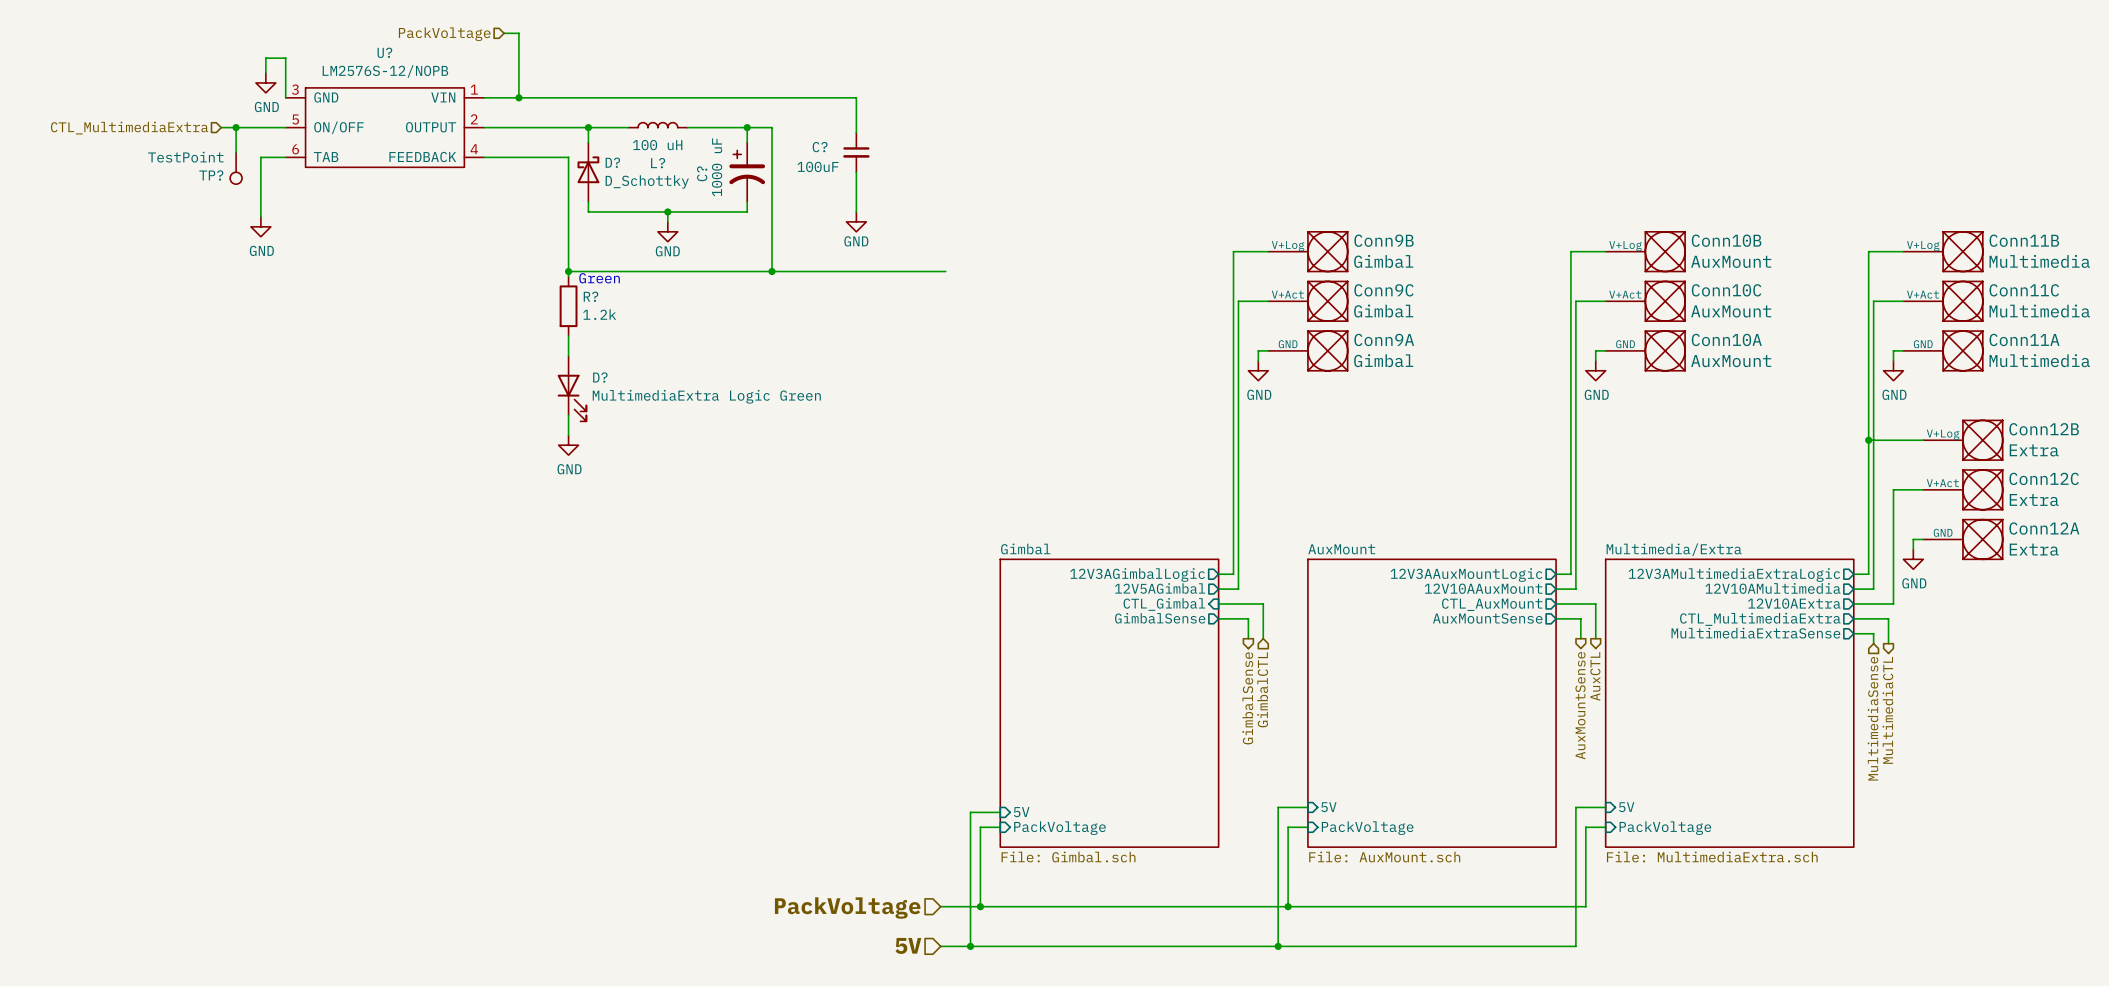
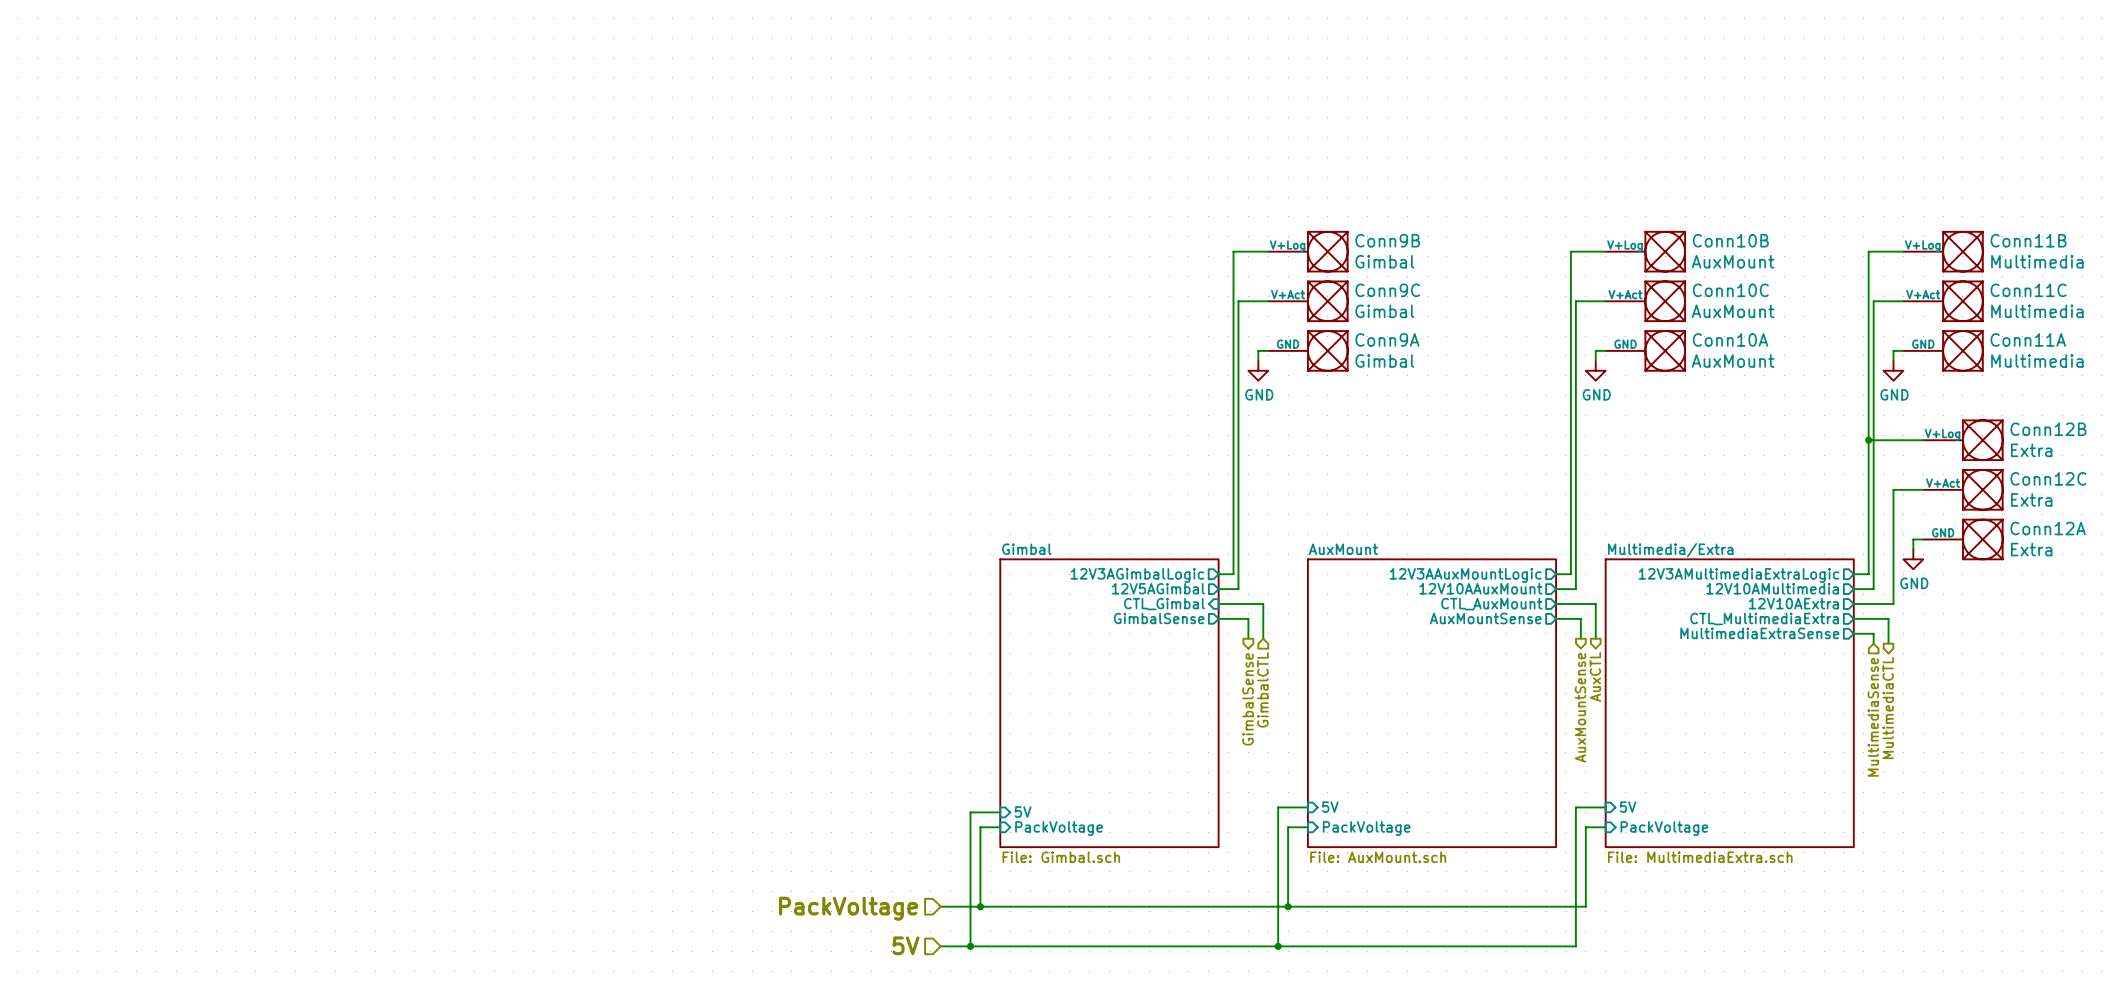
wire: (504, 33) (518, 33) (518, 97) -> none
hierarchical label: PackVoltage (444, 34) -> none
wire: (265, 73) (265, 58) (285, 58) (285, 97) -> none
power symbol: GND (265, 82) -> none
wire: (484, 97) (856, 97) (856, 132) -> none
junction: (518, 97) -> none
L?: 100 uH (657, 125) -> none
wire: (221, 127) (285, 127) -> none
wire: (236, 127) (236, 152) -> none
junction: (236, 127) -> none
U?: LM2576S-12/NOPB (384, 127) -> none
wire: (484, 127) (628, 127) -> none
wire: (588, 127) (588, 142) -> none
junction: (588, 127) -> none
wire: (687, 127) (772, 127) (772, 271) -> none
wire: (747, 127) (747, 142) -> none
junction: (747, 127) -> none
hierarchical label: CTL_MultimediaExtra (129, 128) -> none
C?: 100uF (856, 152) -> none
wire: (285, 157) (260, 157) (260, 216) -> none
wire: (484, 157) (568, 157) (568, 276) -> none
TP?: TestPoint (236, 168) -> none
D?: D_Schottky (588, 172) -> none
C?: 1000 uF (747, 172) -> none
wire: (856, 172) (856, 211) -> none
wire: (588, 202) (588, 211) (747, 211) (747, 202) -> none
wire: (667, 211) (667, 221) -> none
junction: (667, 211) -> none
power symbol: GND (856, 221) -> none
power symbol: GND (260, 226) -> none
power symbol: GND (667, 231) -> none
wire: (568, 271) (945, 271) -> none
junction: (568, 271) -> none
junction: (772, 271) -> none
text: Green (599, 278) -> none
R?: 1.2k (568, 306) -> none
wire: (568, 336) (568, 355) -> none
D?: MultimediaExtra Logic Green (572, 388) -> none
wire: (568, 415) (568, 435) -> none
power symbol: GND (568, 445) -> none

